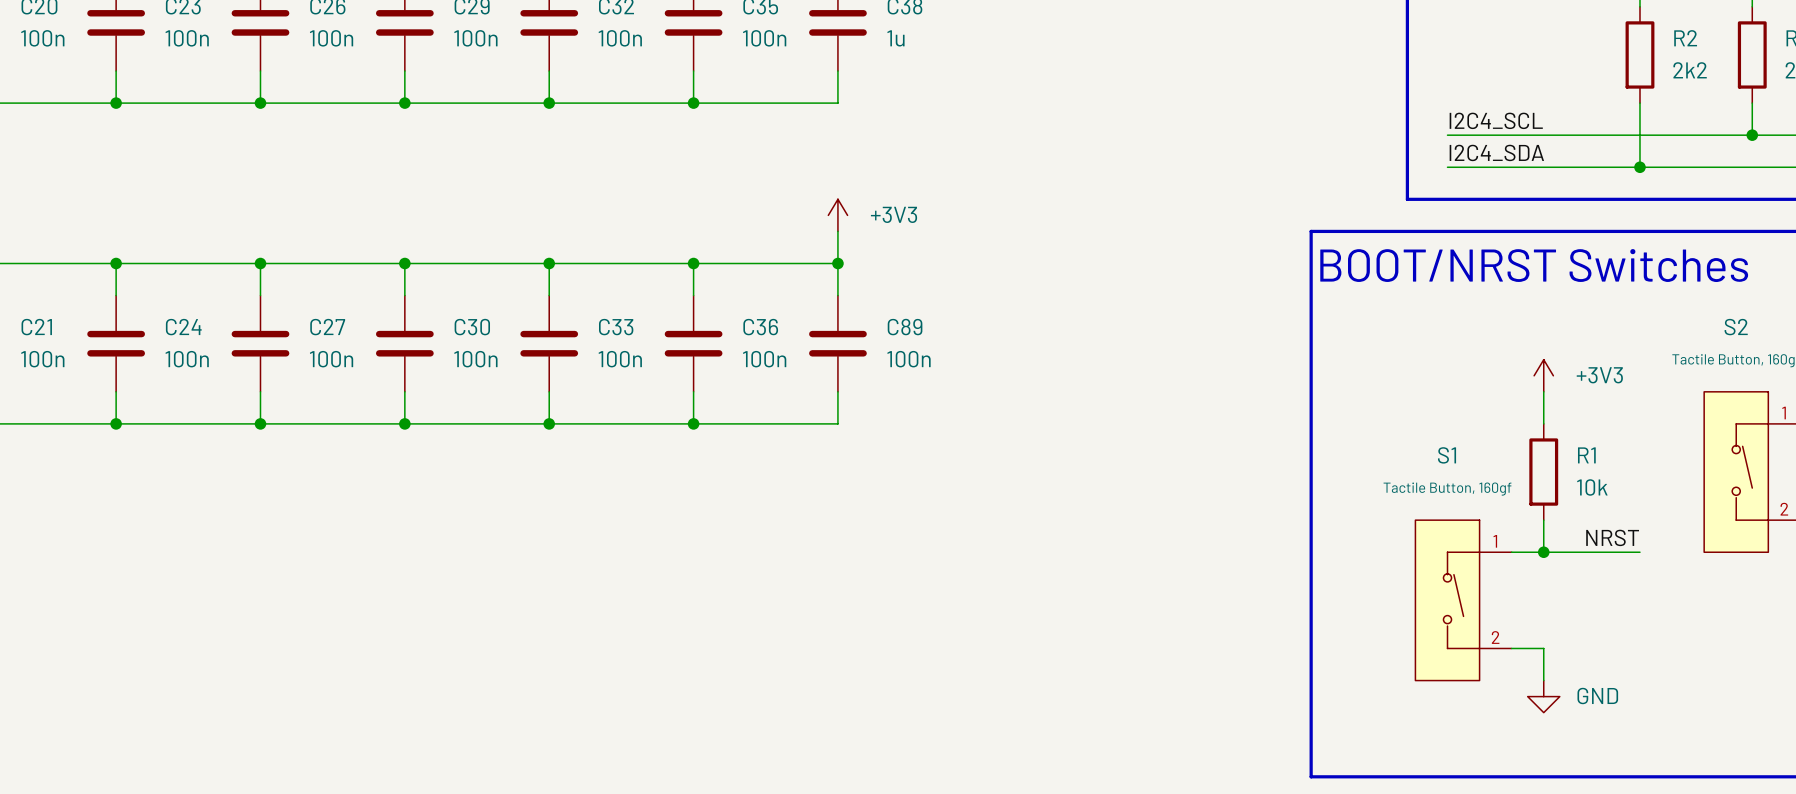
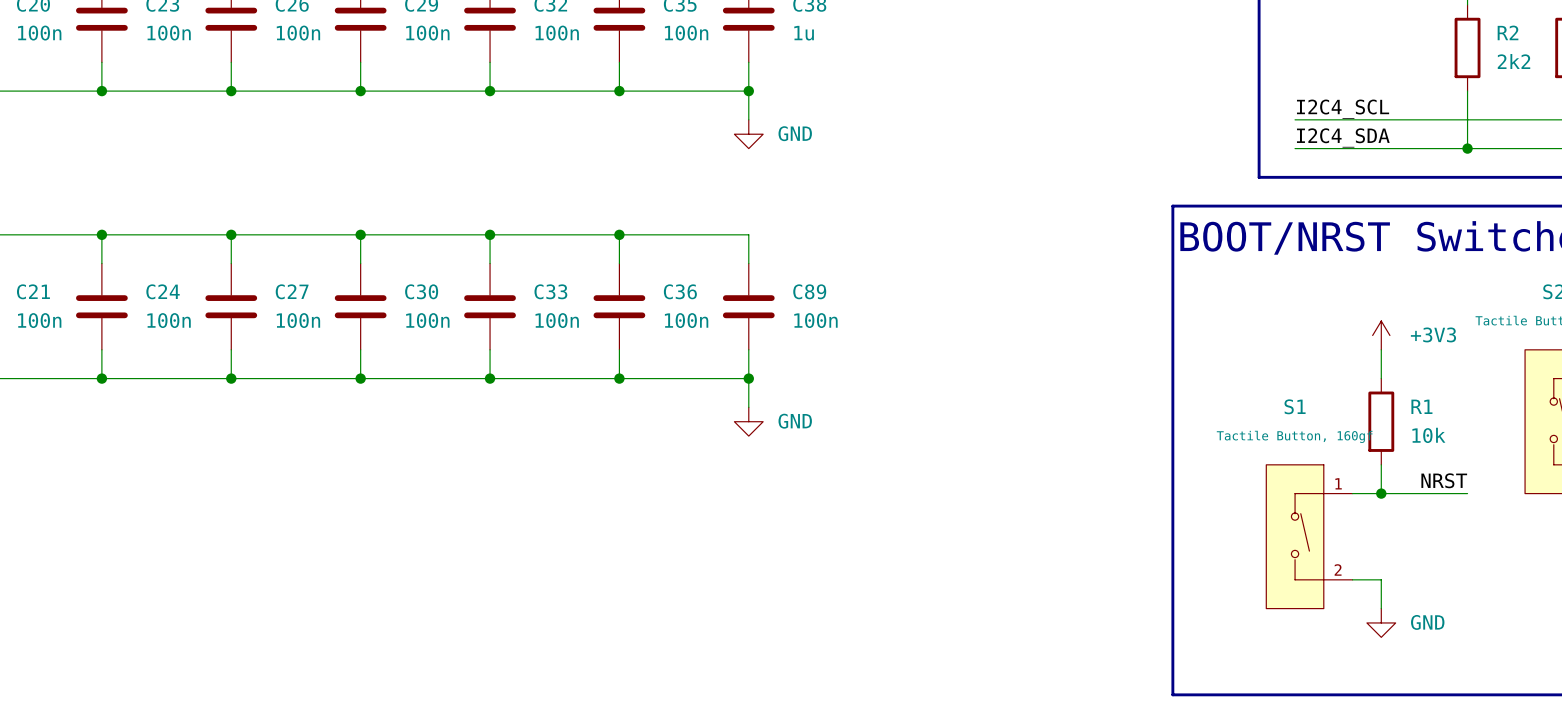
junction: none -> (748, 91)
power symbol: none -> GND (748, 134)
power symbol: +3V3 (837, 215) -> none
wire: (837, 231) (837, 263) -> (748, 91) (748, 119)
junction: (837, 263) -> none
wire: none -> (748, 378) (748, 407)
junction: none -> (748, 378)
power symbol: none -> GND (748, 421)

